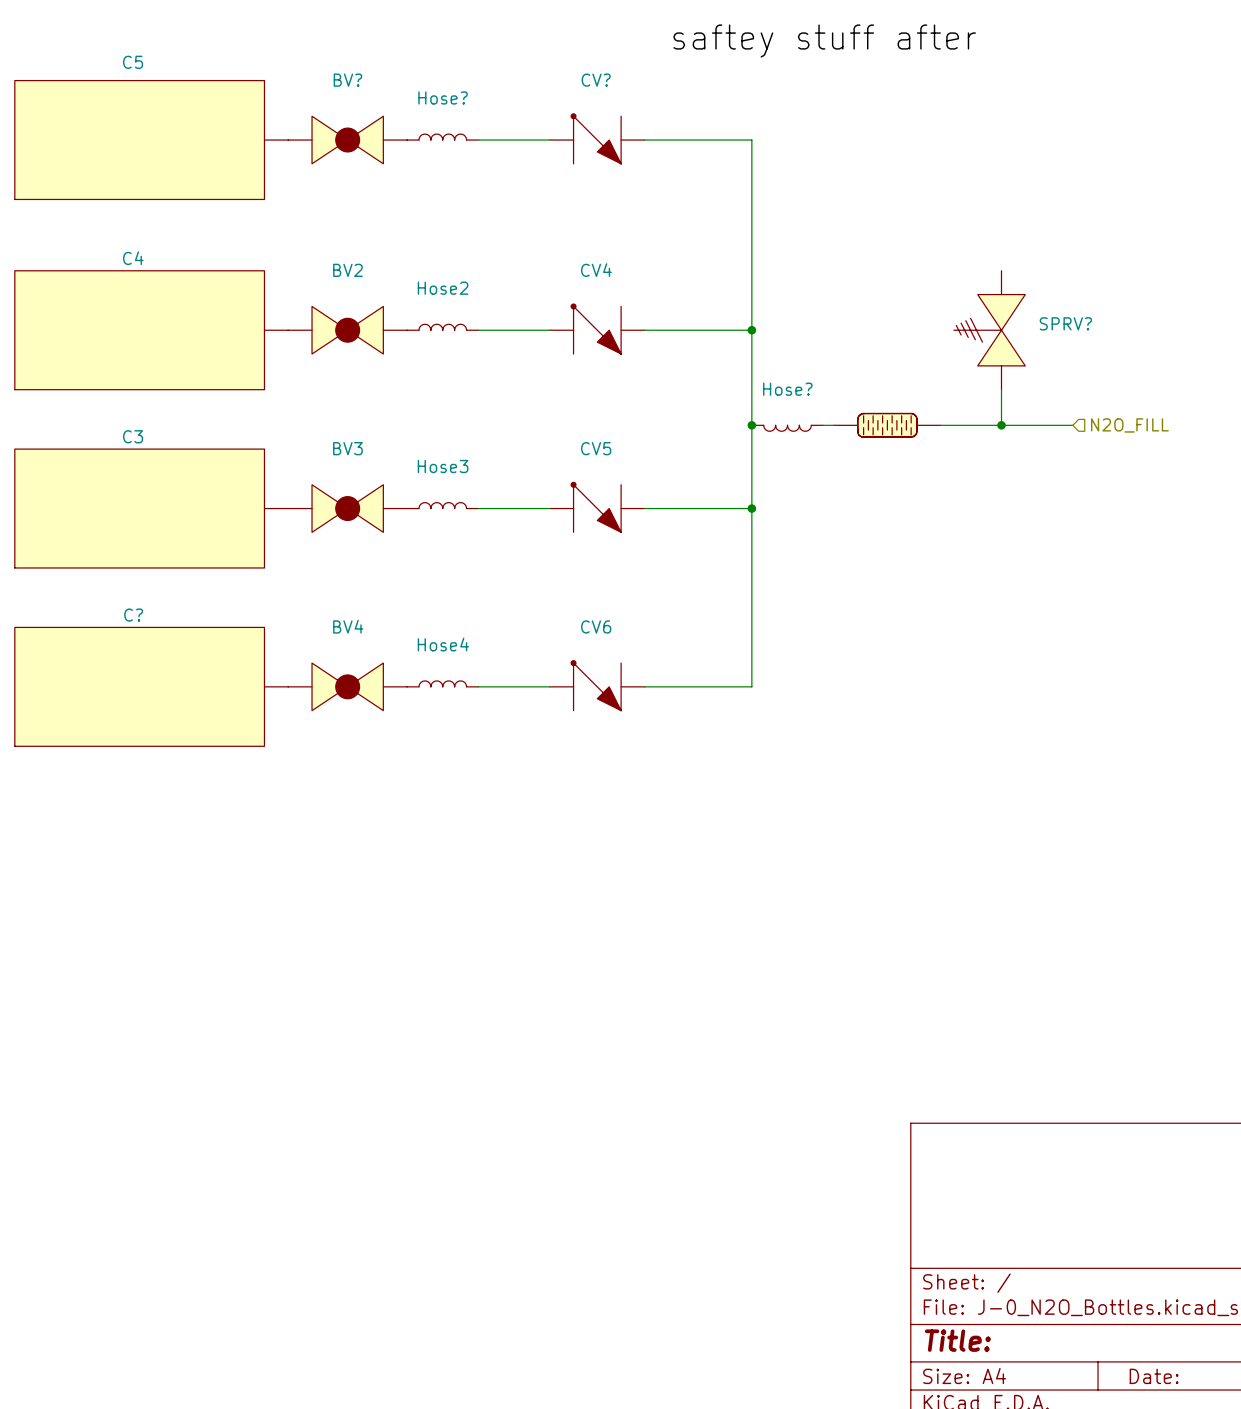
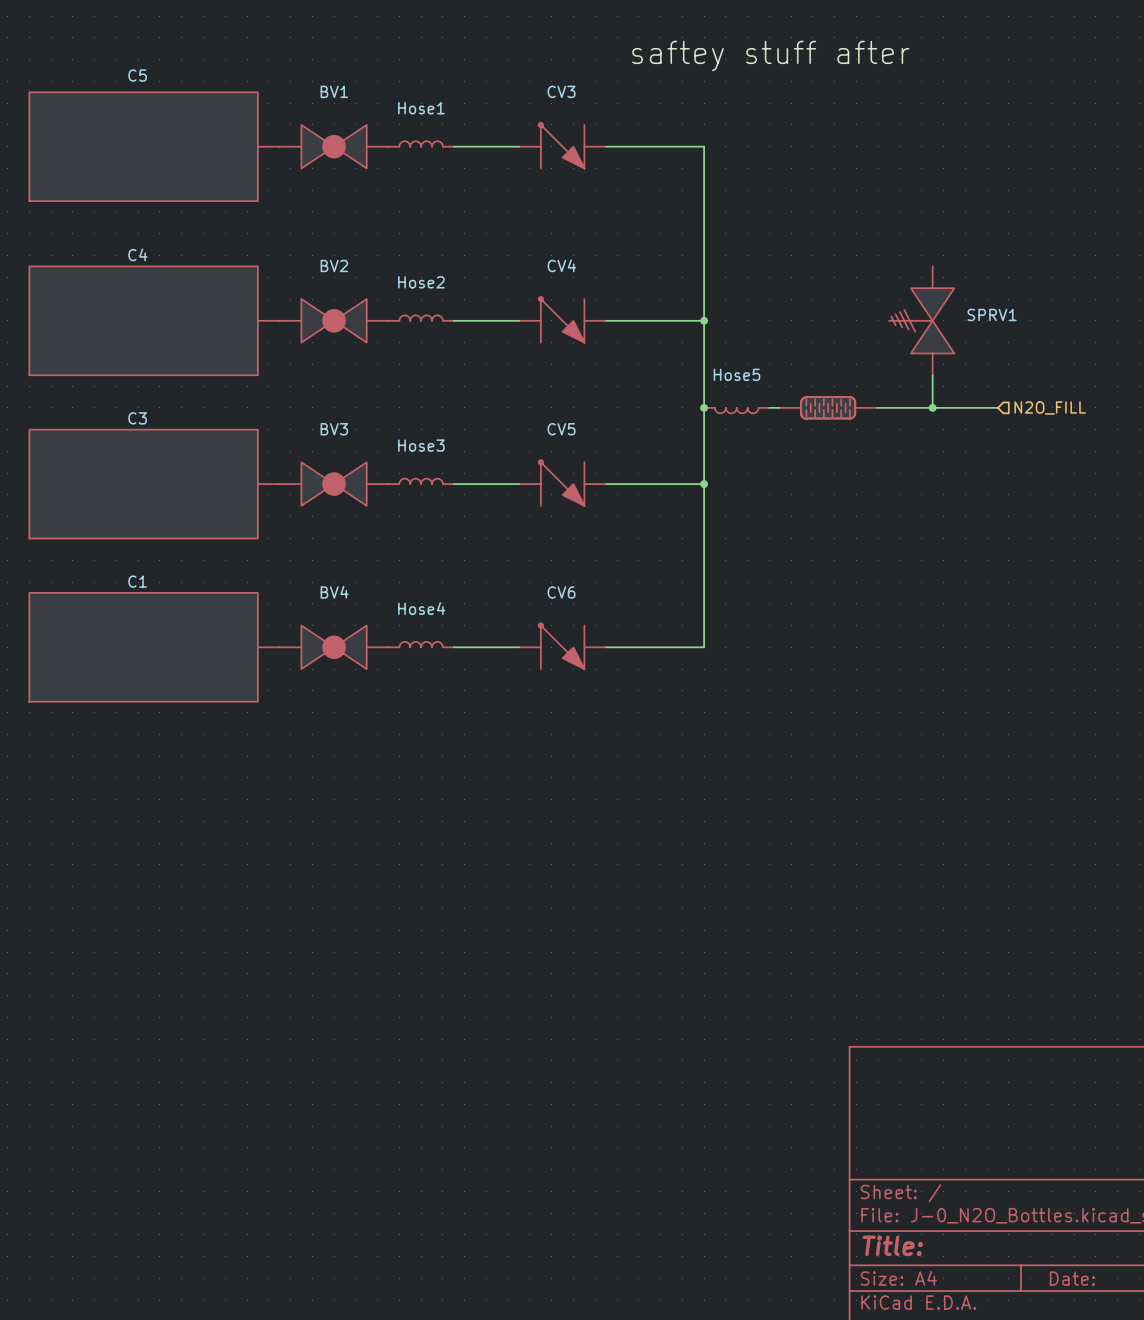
BV? name: BV? (347, 80) -> BV1 (334, 91)
CV? name: CV? (596, 80) -> CV3 (561, 91)
Hose? name: Hose? (443, 97) -> Hose1 (421, 108)
SPRV? name: SPRV? (1065, 323) -> SPRV1 (992, 314)
Hose? name: Hose? (787, 389) -> Hose5 (737, 374)
C? name: C? (133, 615) -> C1 (137, 581)

